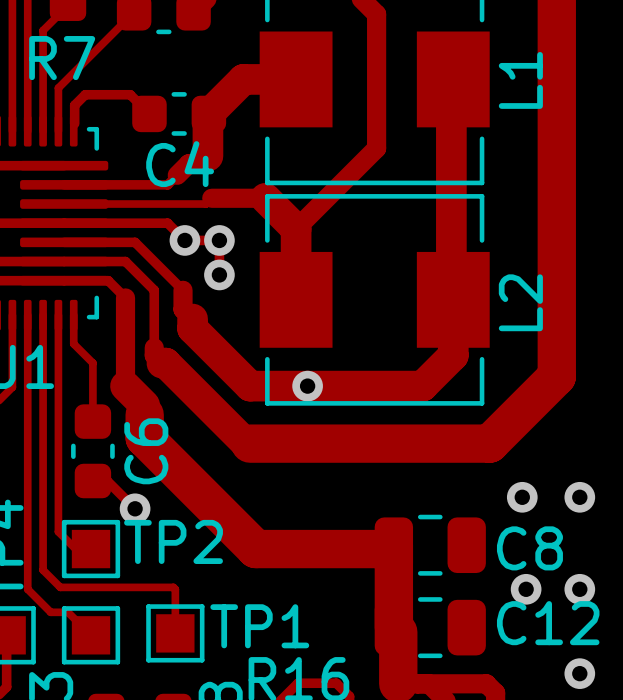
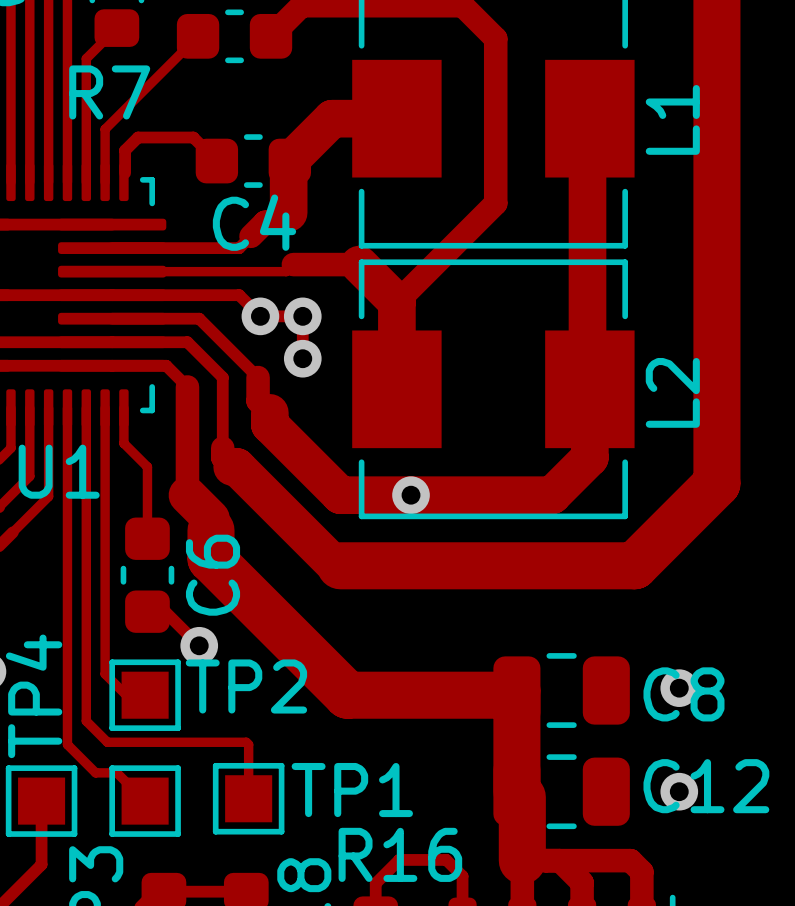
via: (522, 497) -> none
via: (579, 497) -> none
via: none -> (679, 688)
via: (526, 589) -> none
via: (579, 589) -> none
via: none -> (679, 791)
via: (579, 673) -> none

